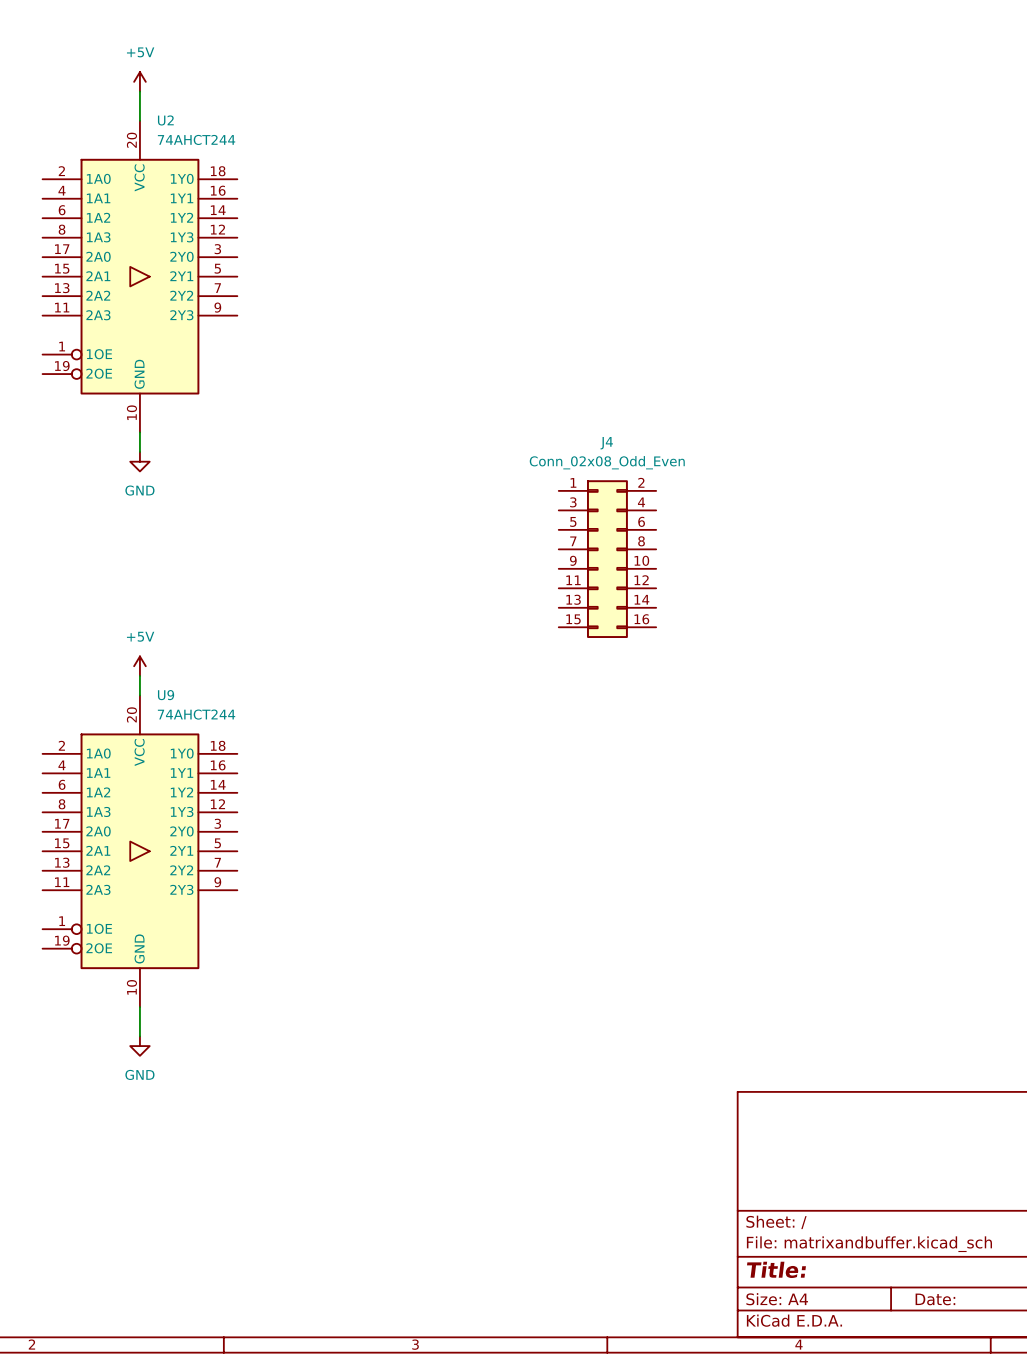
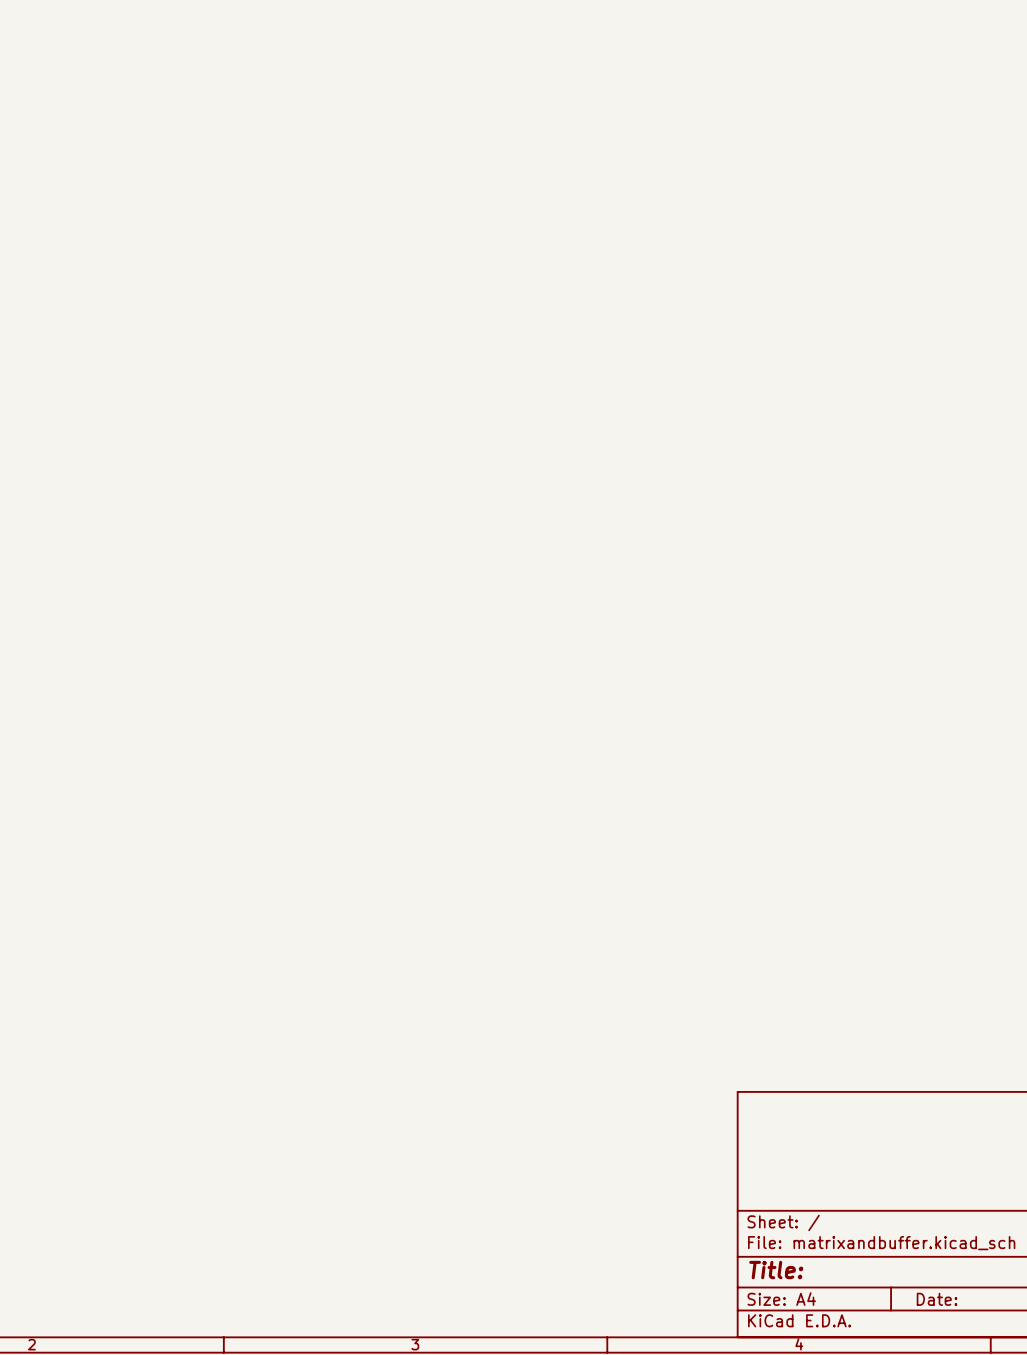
power symbol: +5V (139, 81) -> none
wire: (139, 91) (139, 120) -> none
U2: 74AHCT244 (139, 276) -> none
wire: (139, 432) (139, 451) -> none
power symbol: GND (139, 461) -> none
J4: Conn_02x08_Odd_Even (607, 559) -> none
power symbol: +5V (139, 666) -> none
wire: (139, 675) (139, 695) -> none
U9: 74AHCT244 (139, 851) -> none
wire: (139, 1007) (139, 1036) -> none
power symbol: GND (139, 1046) -> none

